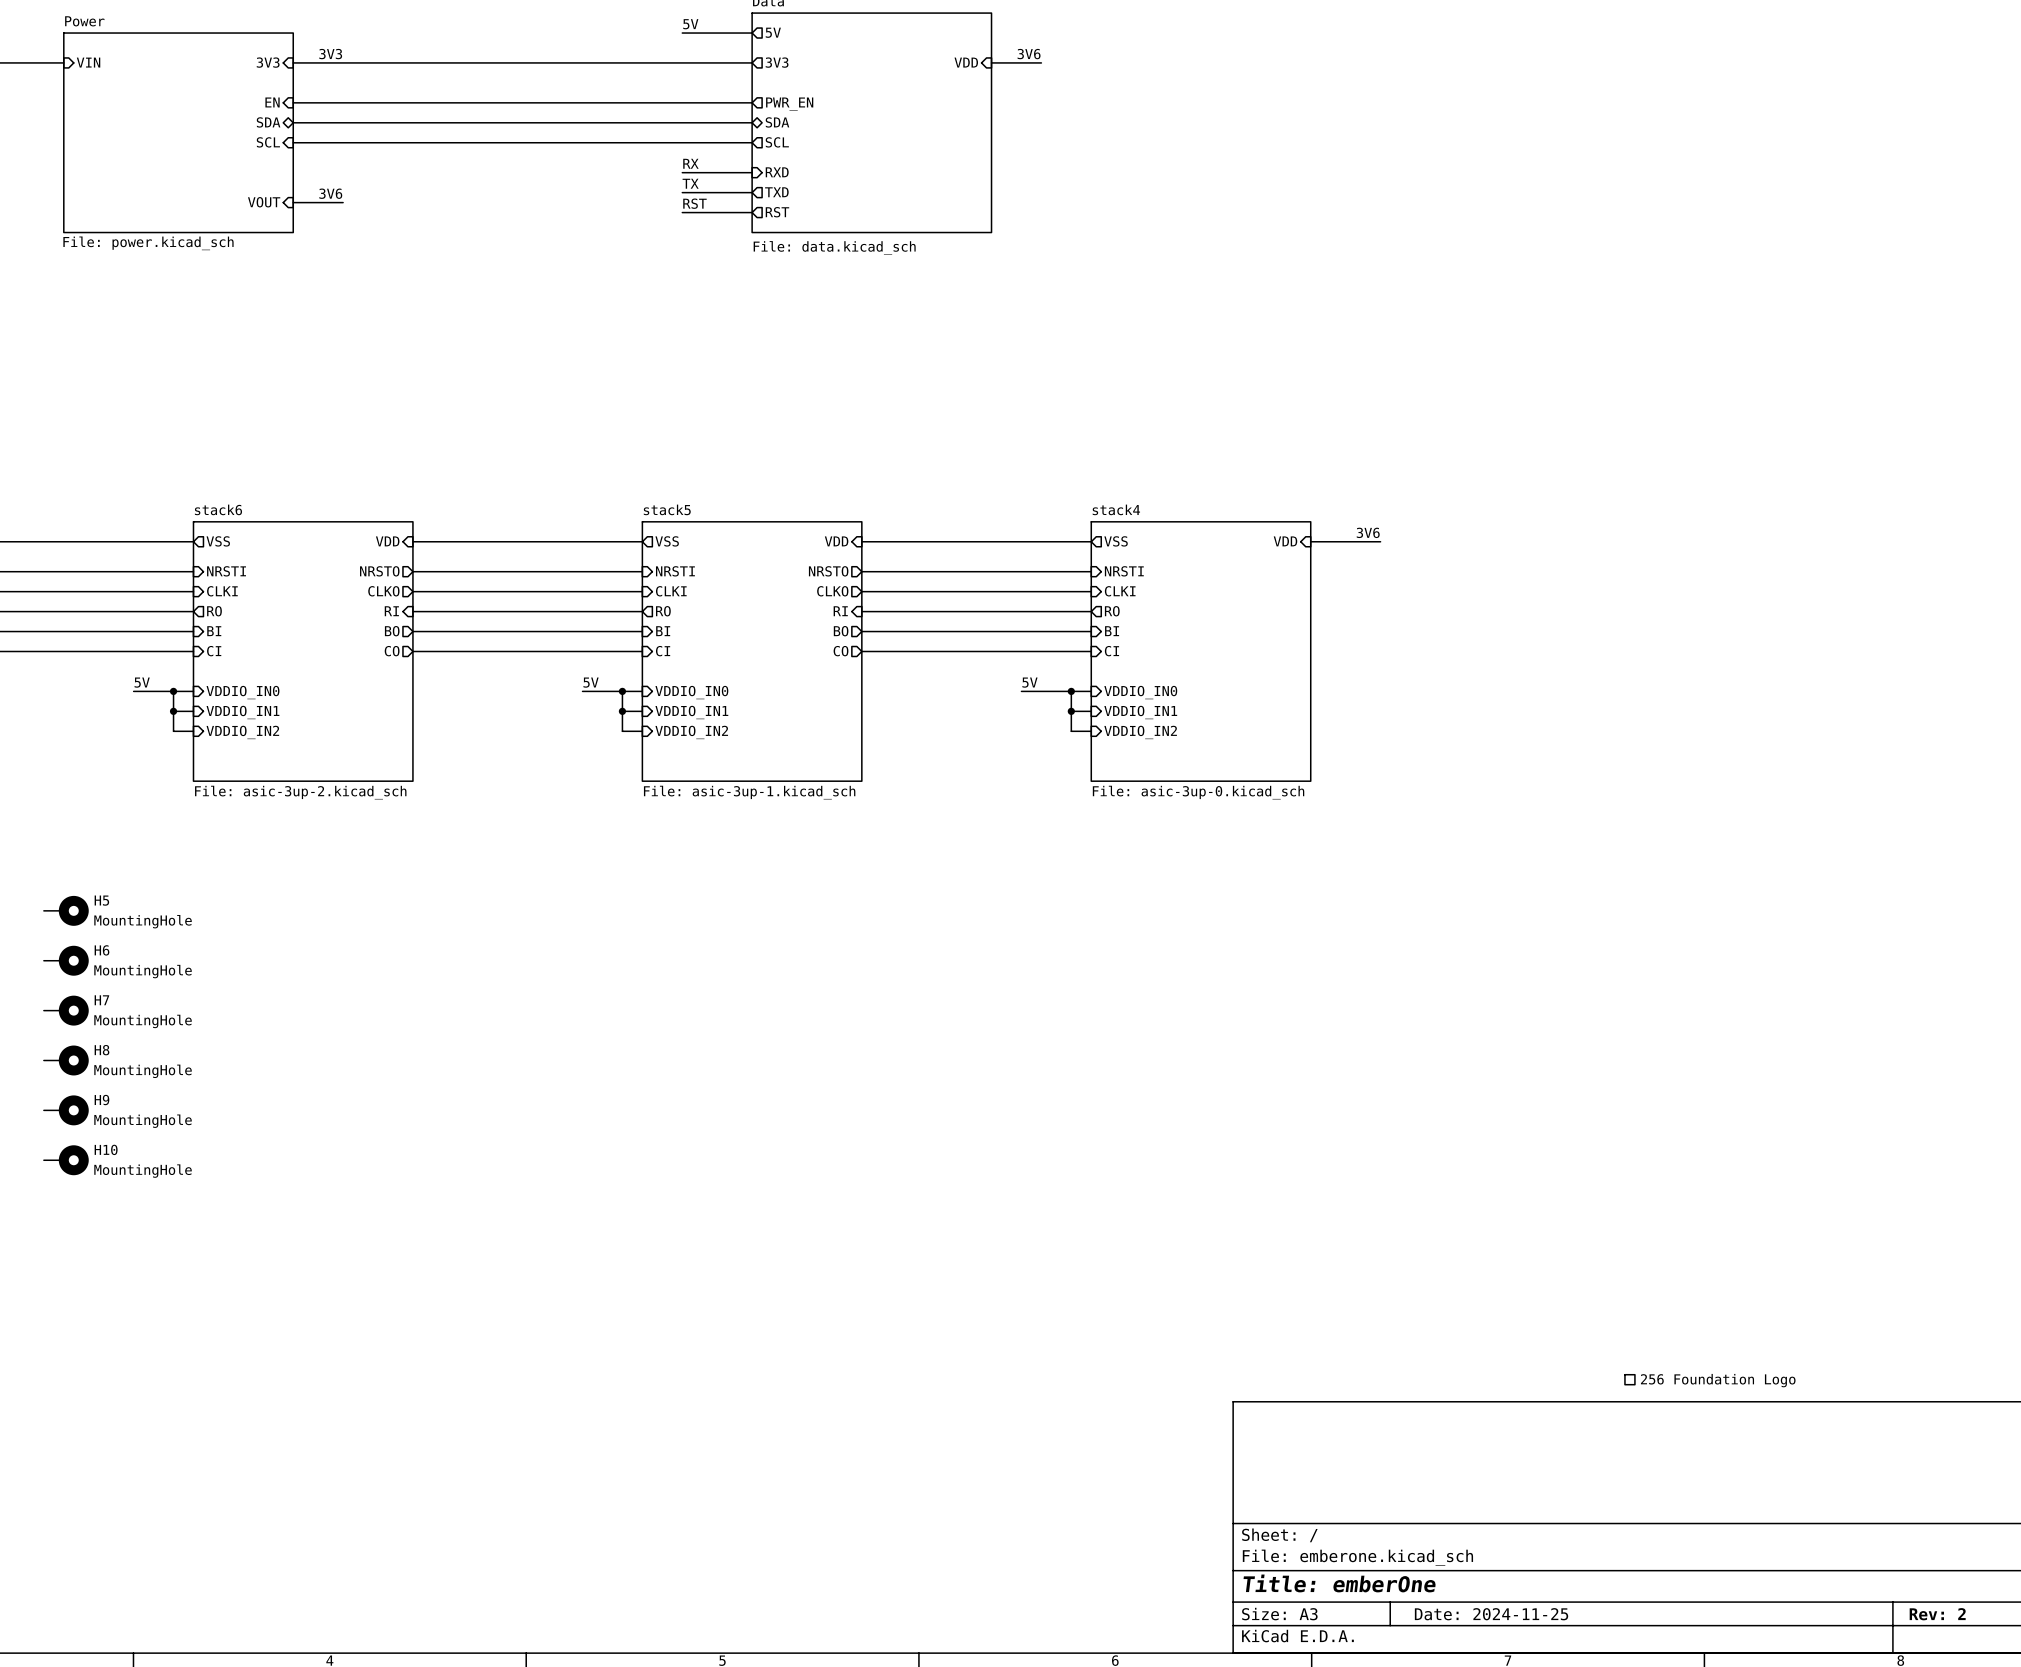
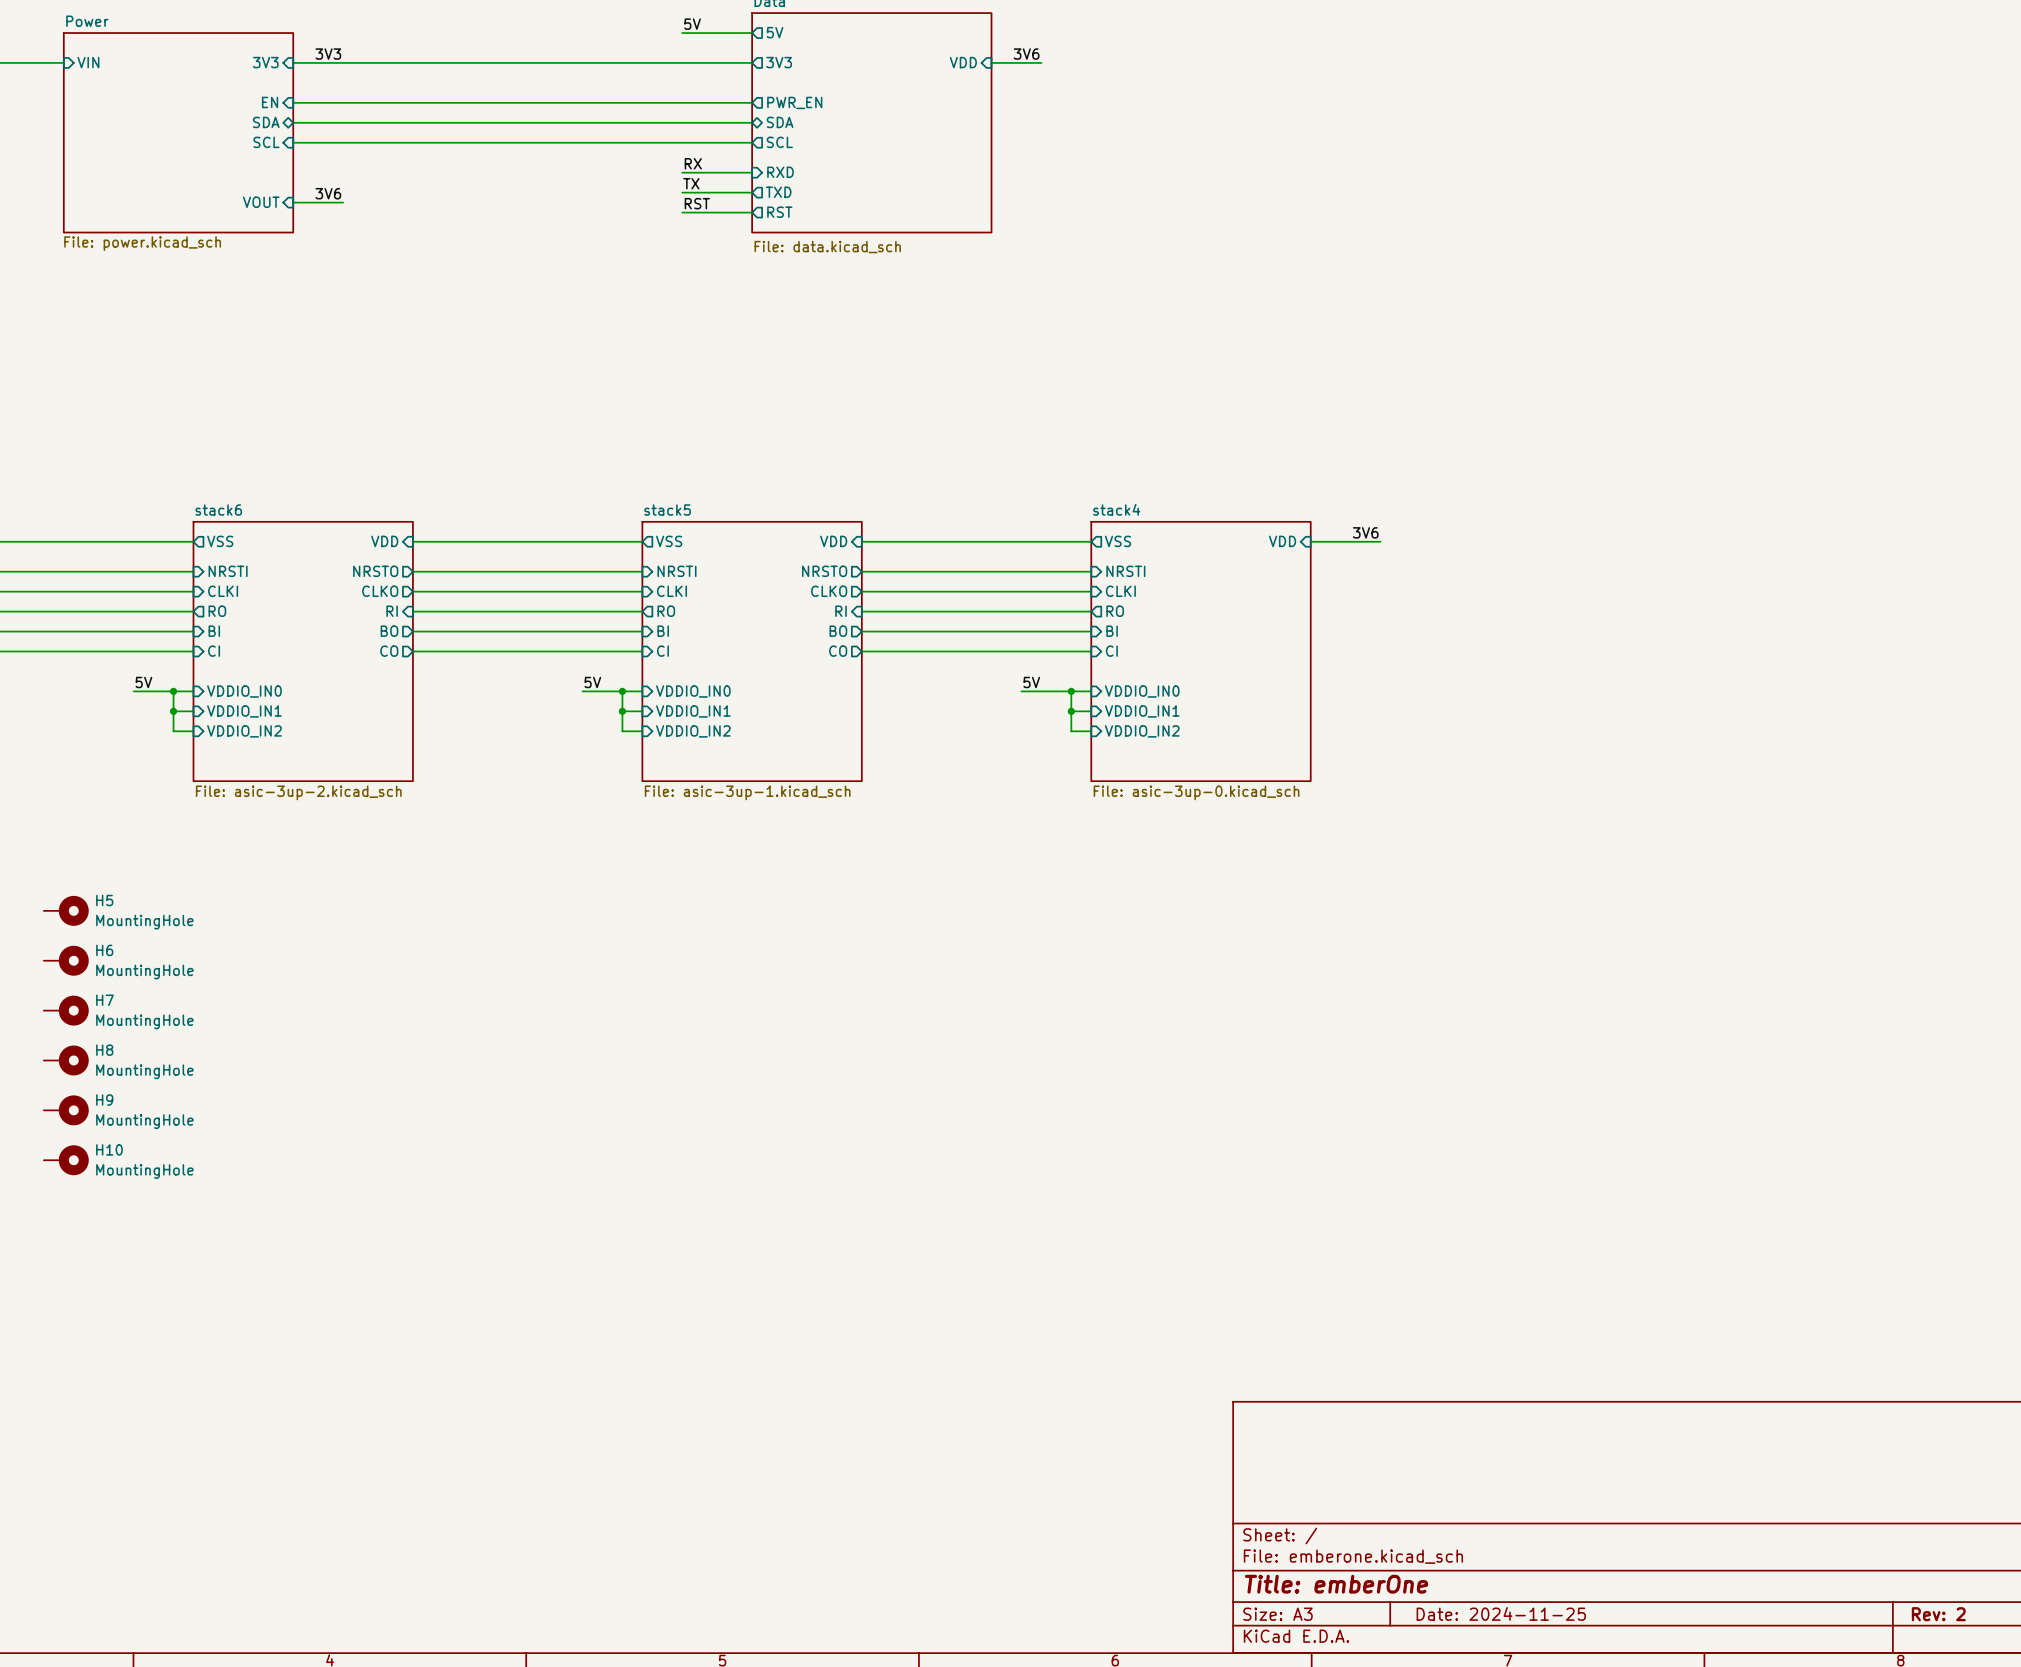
part: 256 Foundation Logo (1629, 1379) -> none

